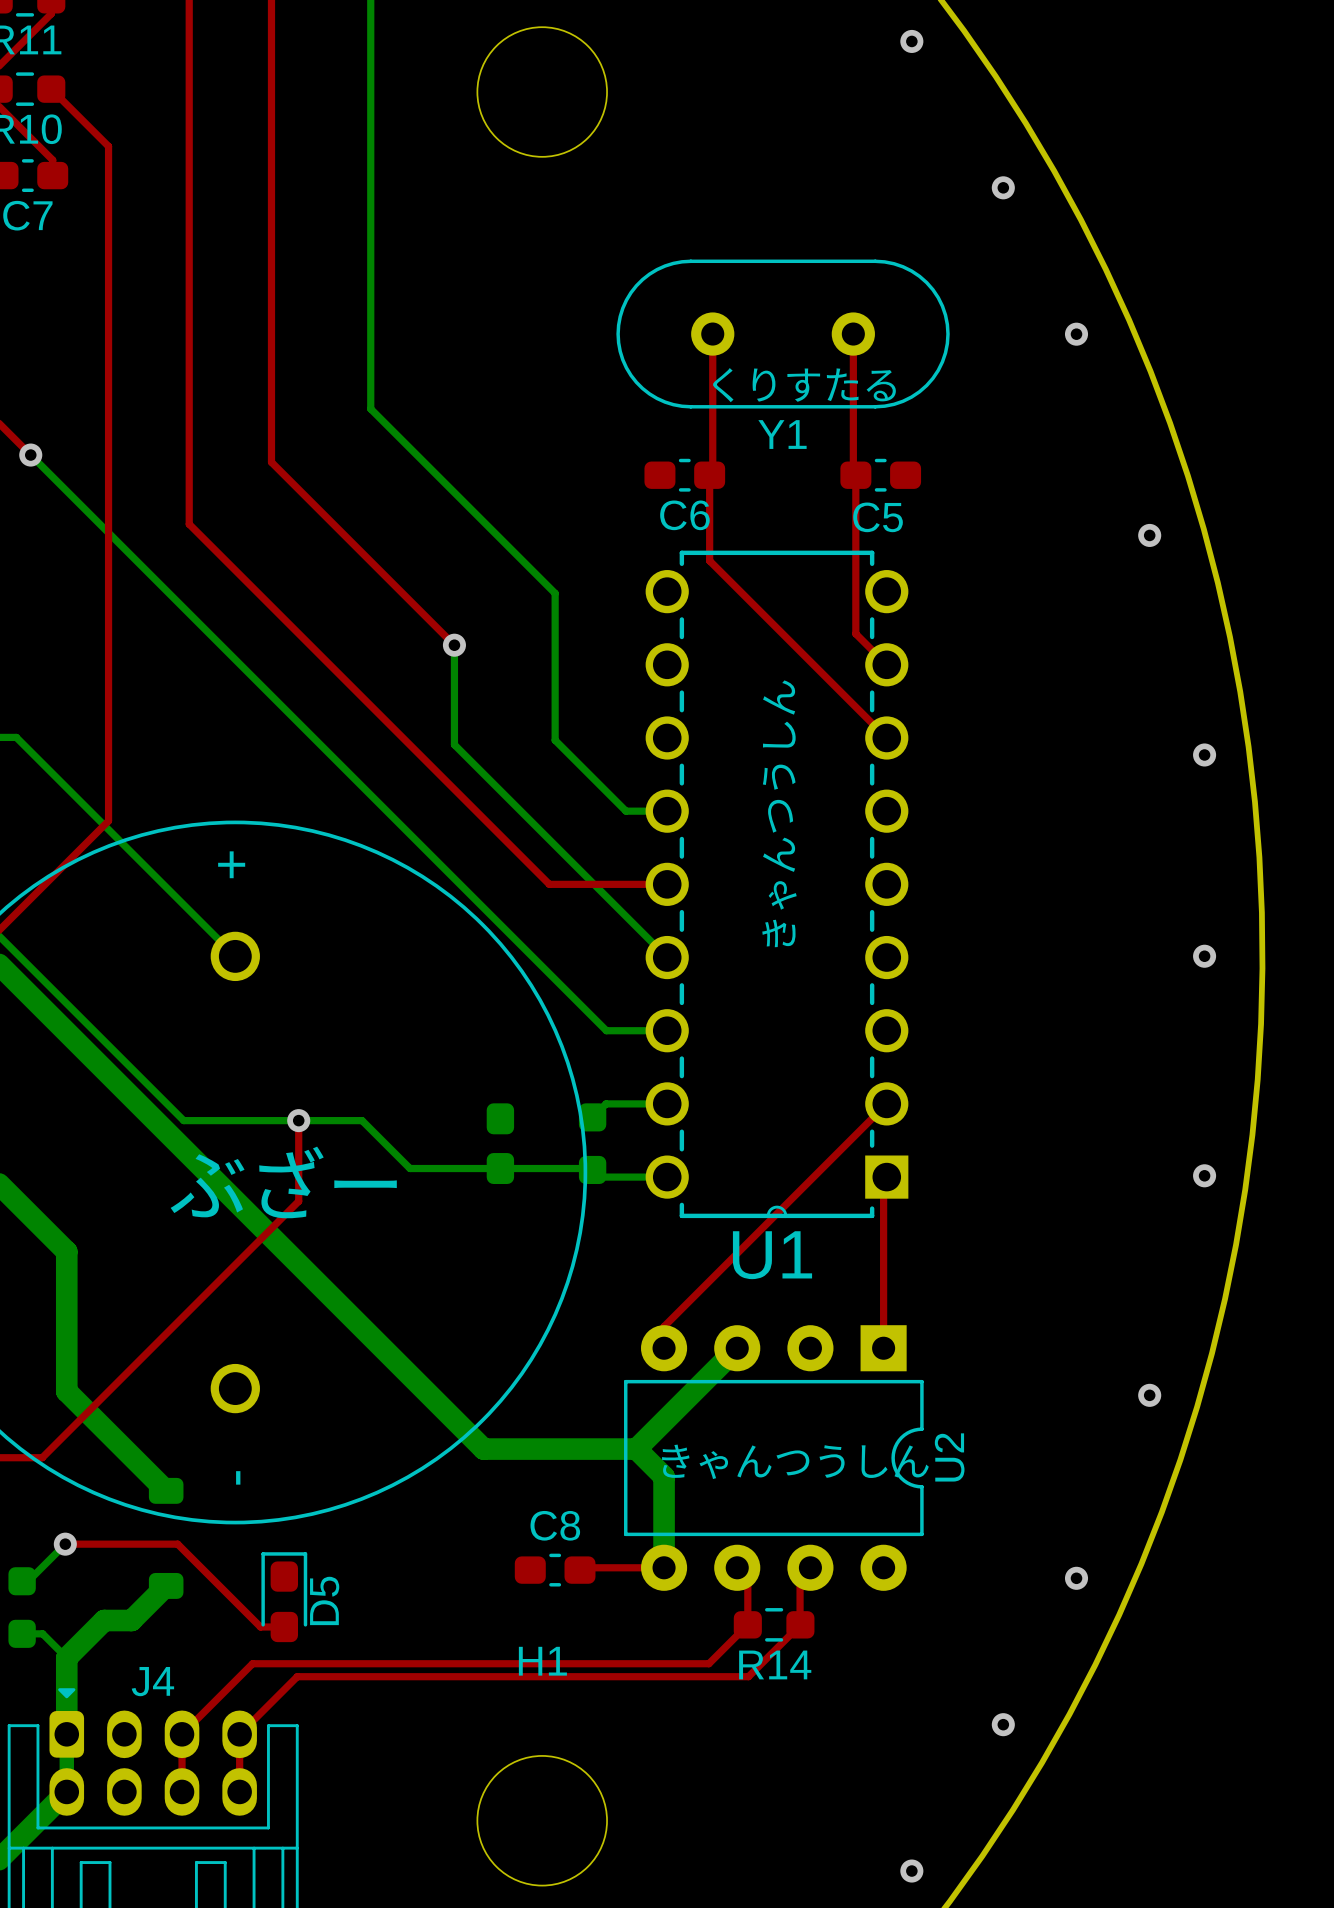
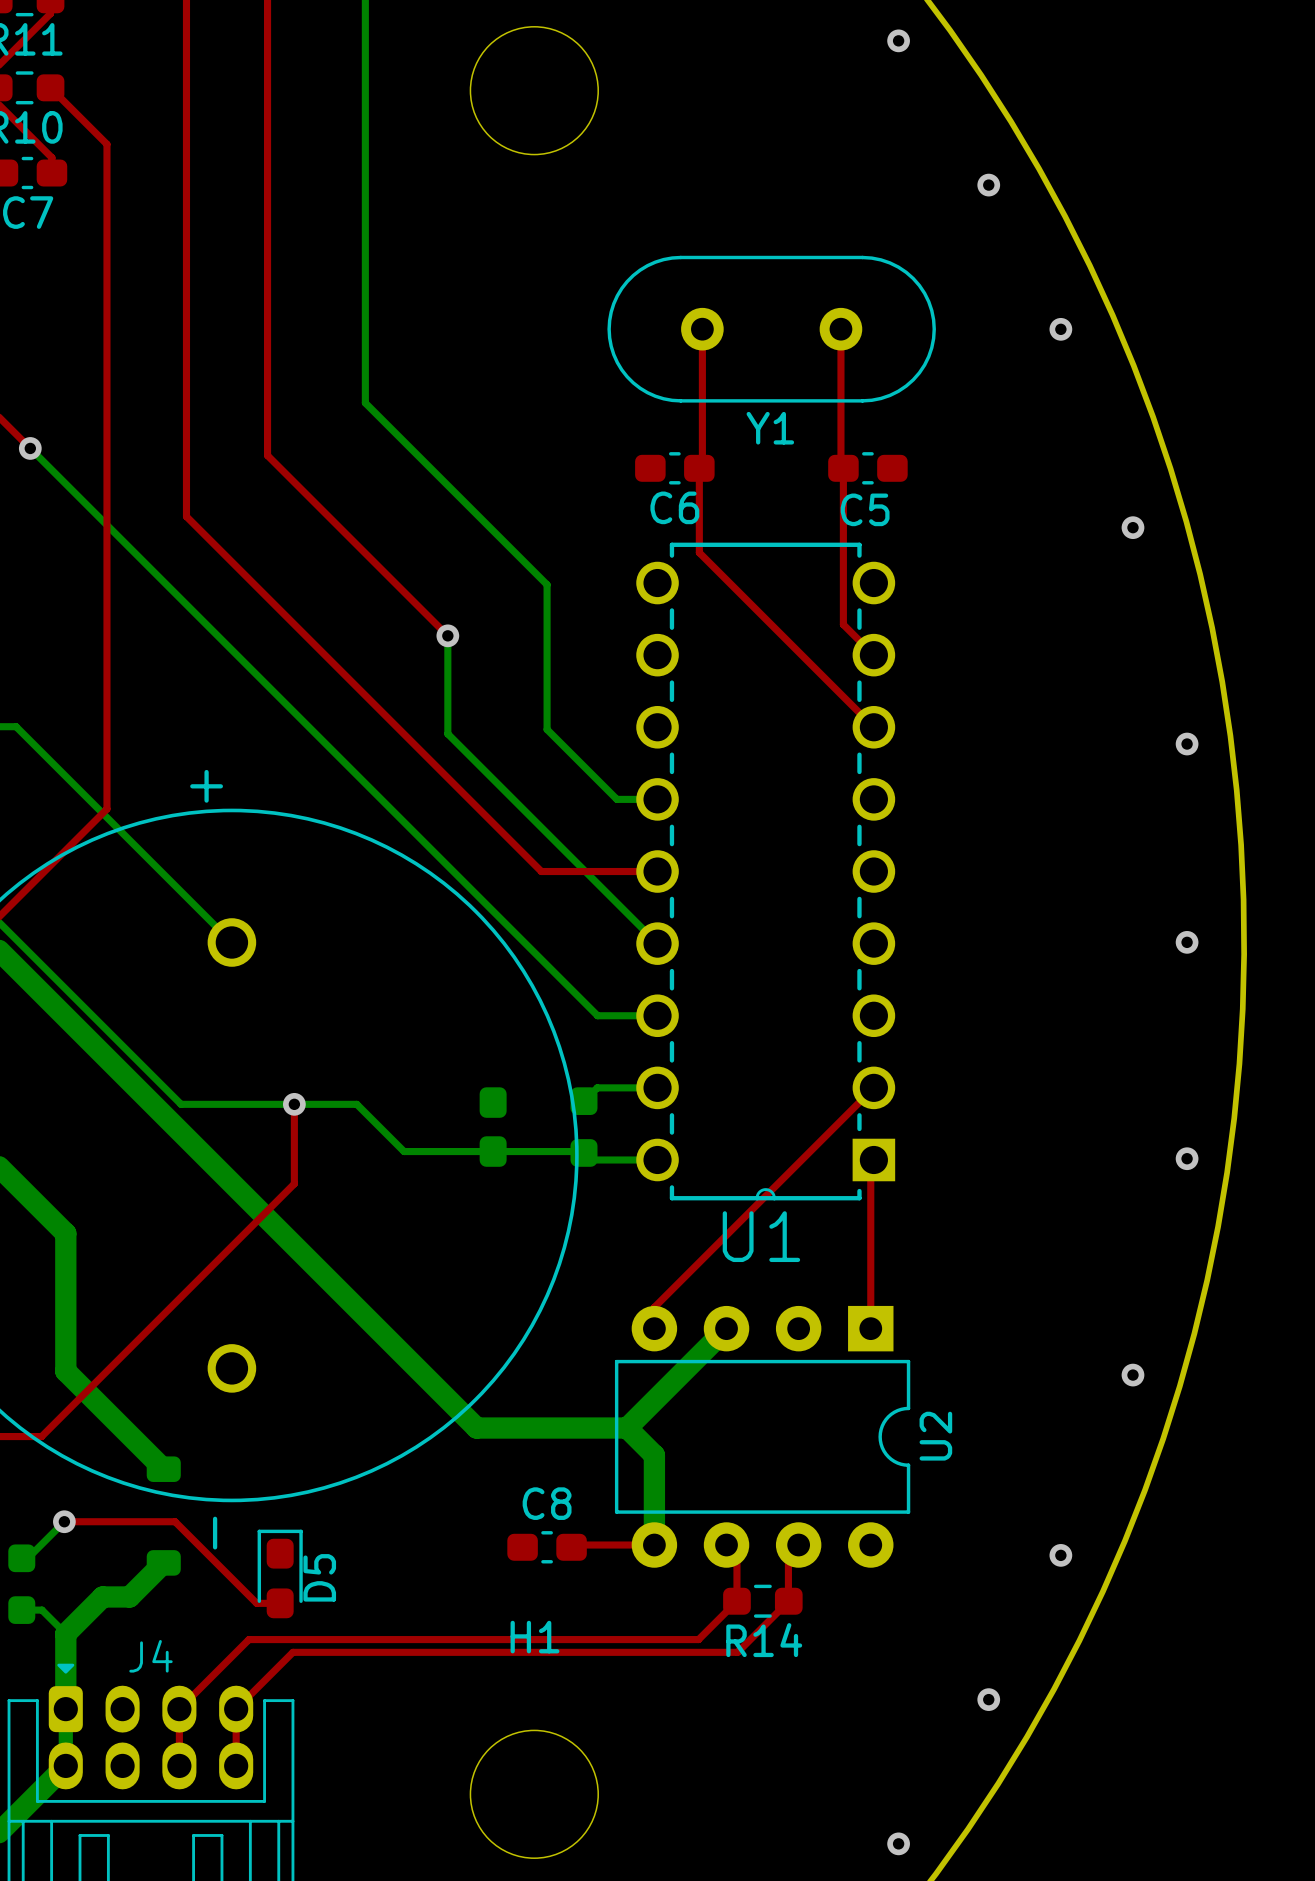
text: くりすたる (803, 385) -> none
text: きゃんつうしん (779, 813) -> none
part text position: + (231, 864) -> + (206, 786)
text: ぶざー (283, 1182) -> none
text: きゃんつうしん (795, 1461) -> none
part text position: - (238, 1477) -> - (215, 1533)

